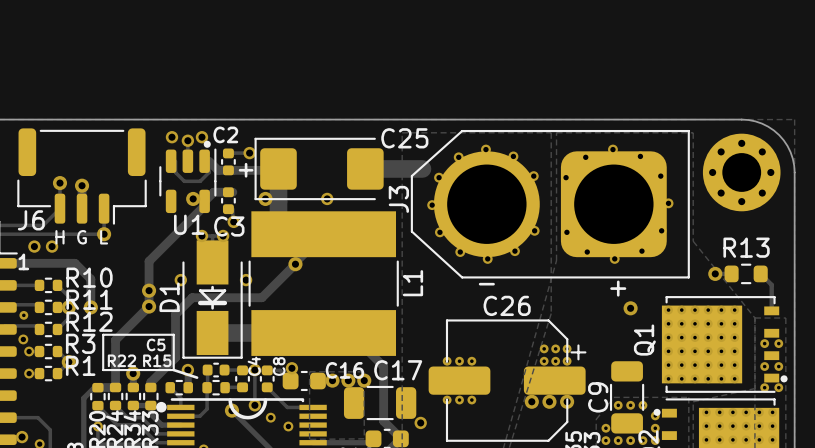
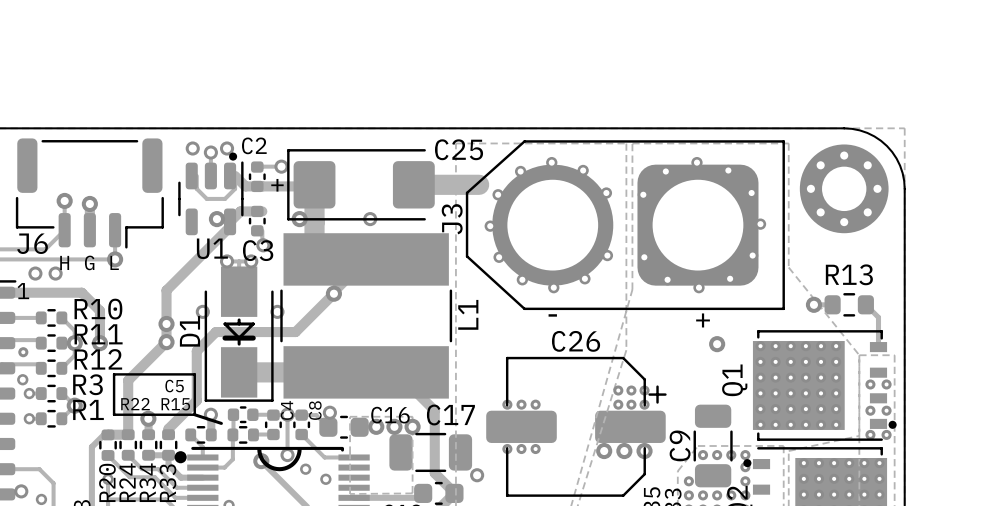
via: none -> (745, 455)

